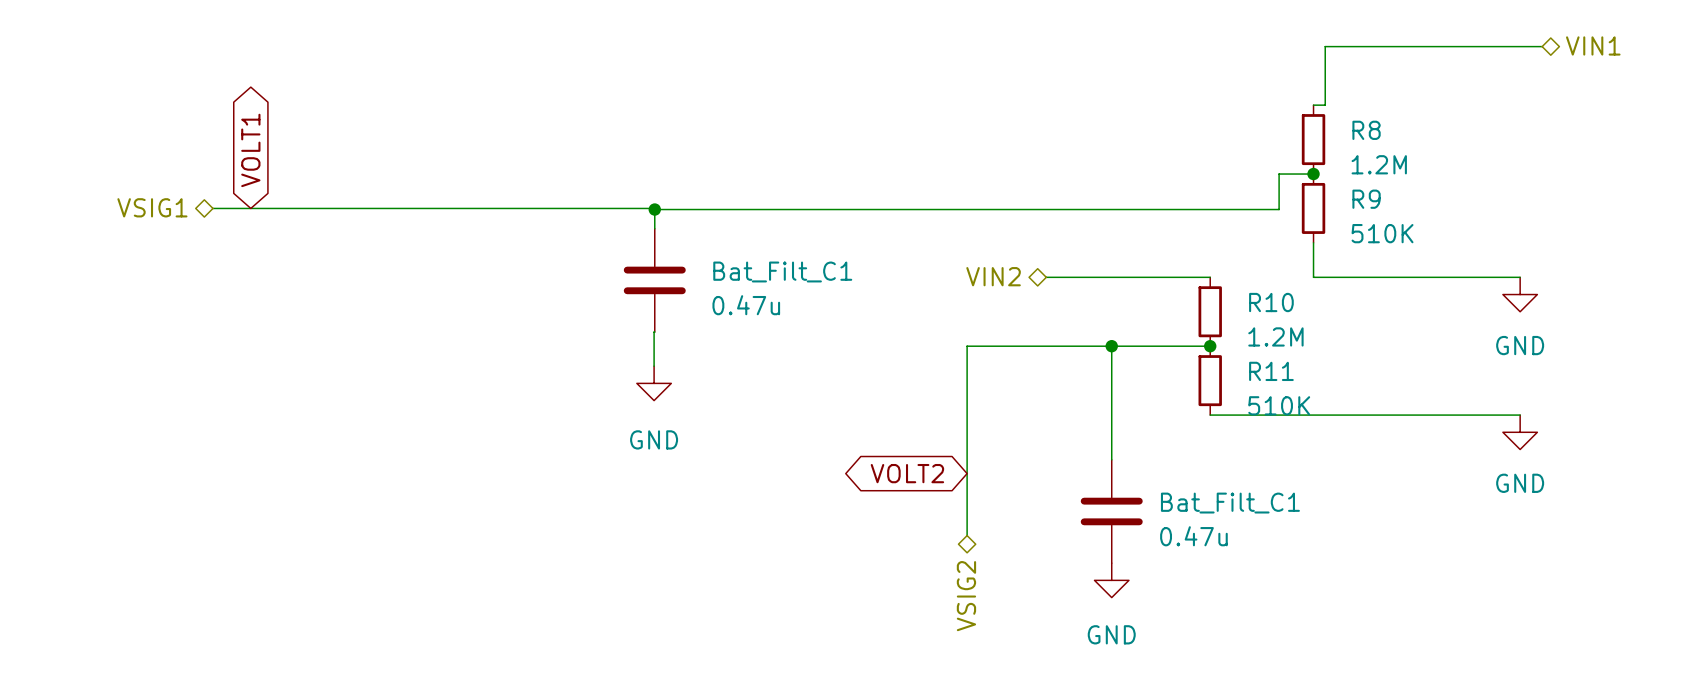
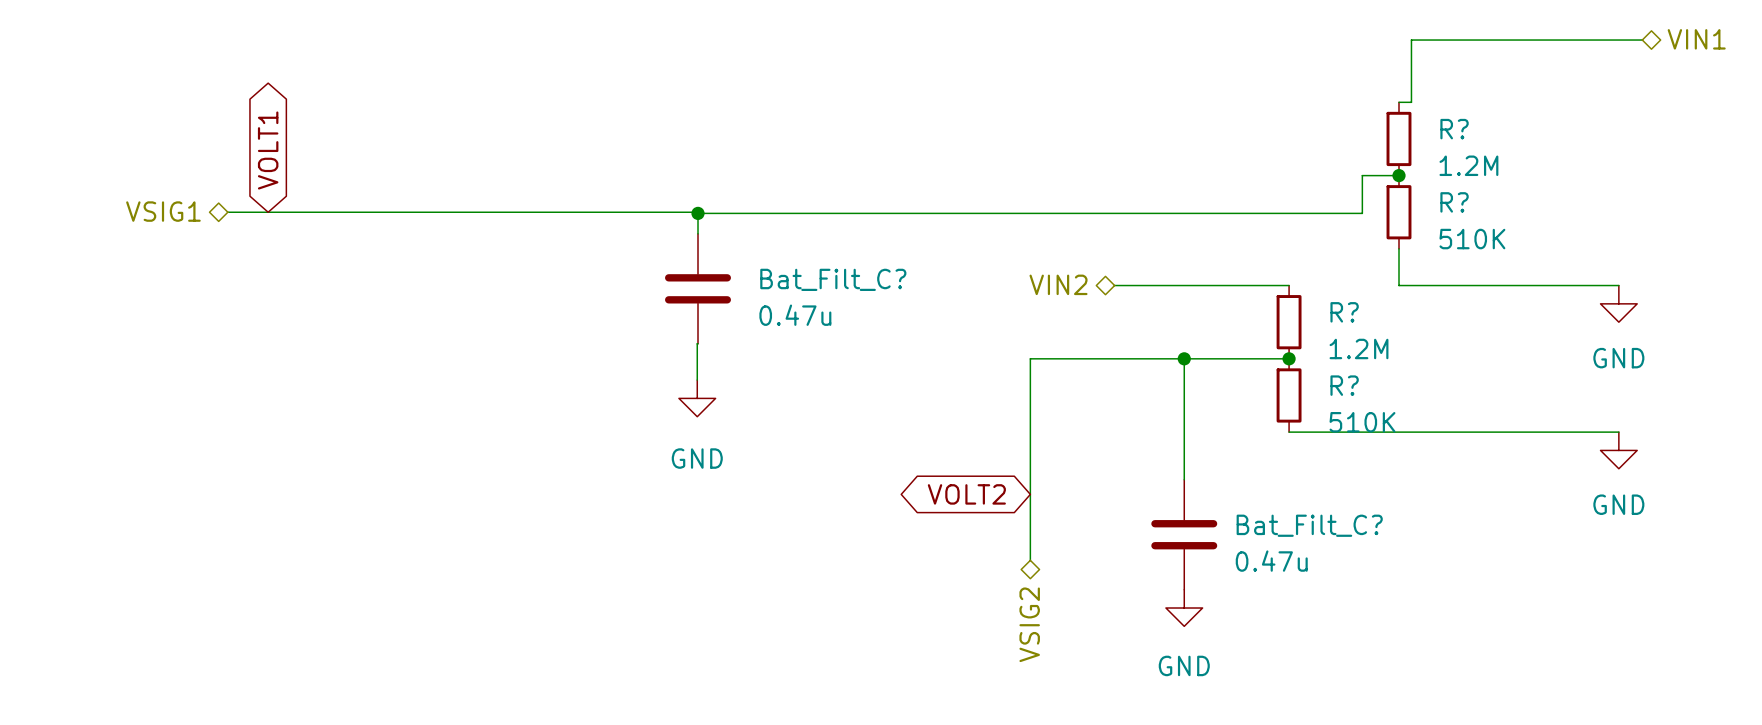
R8 name: R8 (1366, 130) -> R? (1454, 129)
R9 name: R9 (1366, 199) -> R? (1454, 202)
Bat_Filt_C1 name: Bat_Filt_C1 (782, 271) -> Bat_Filt_C? (833, 279)
R10 name: R10 (1271, 302) -> R? (1344, 312)
R11 name: R11 (1271, 371) -> R? (1344, 385)
Bat_Filt_C1 name: Bat_Filt_C1 (1230, 503) -> Bat_Filt_C? (1309, 525)

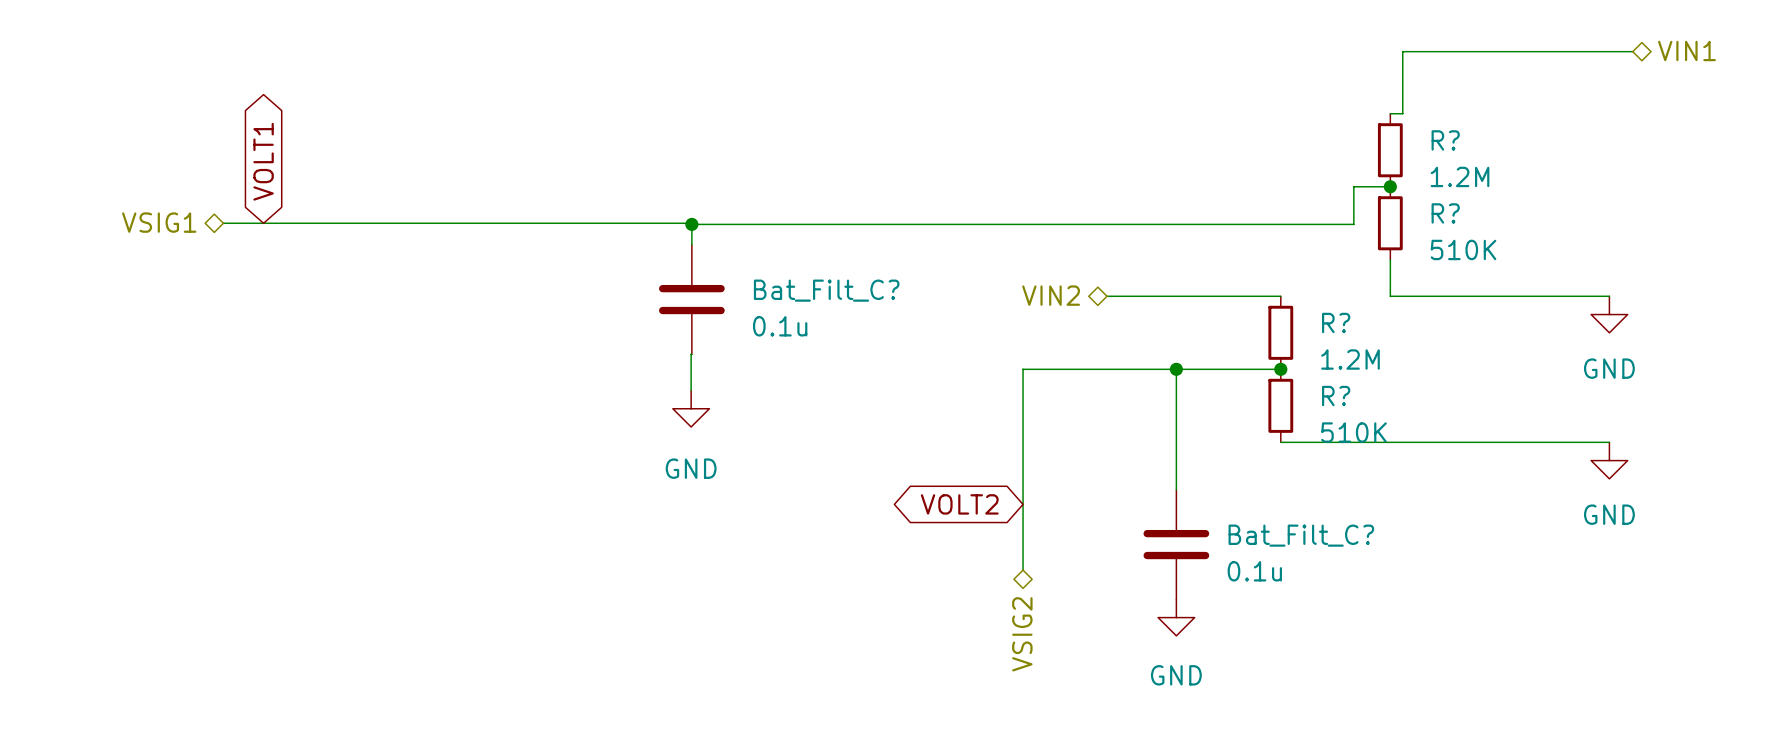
Bat_Filt_C? value: 0.47u (795, 315) -> 0.1u (780, 326)
Bat_Filt_C? value: 0.47u (1271, 561) -> 0.1u (1254, 571)

